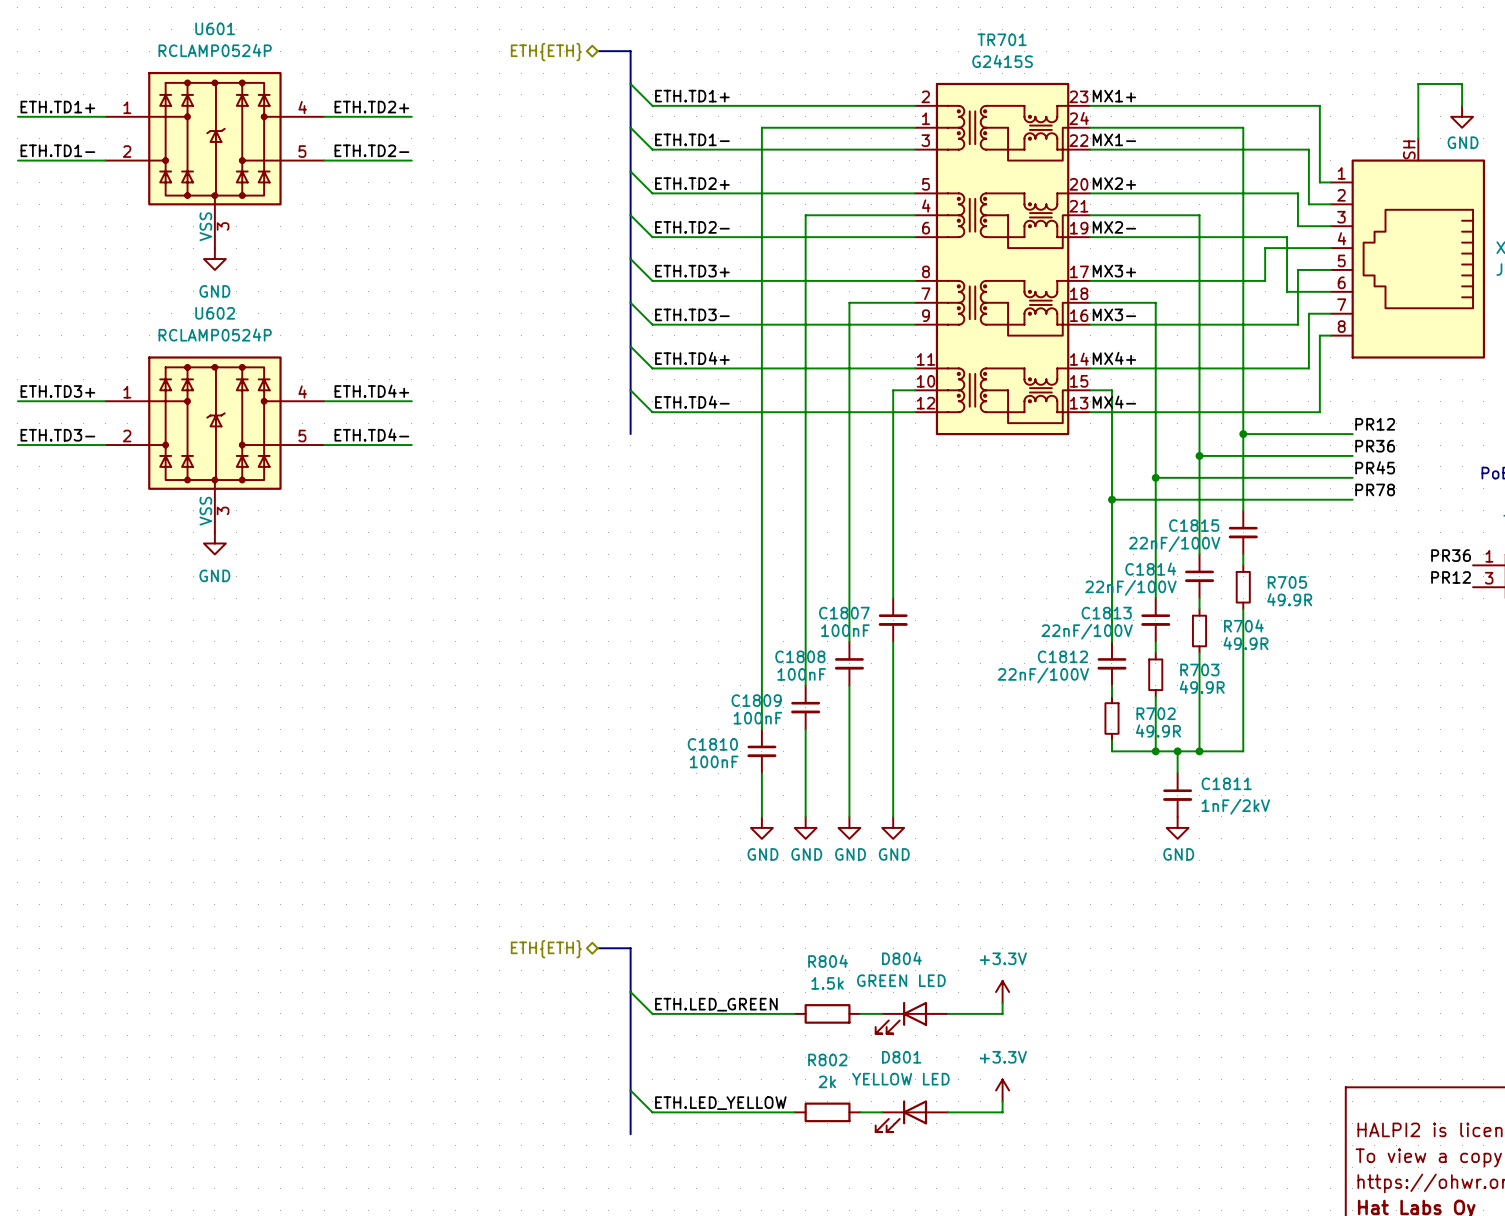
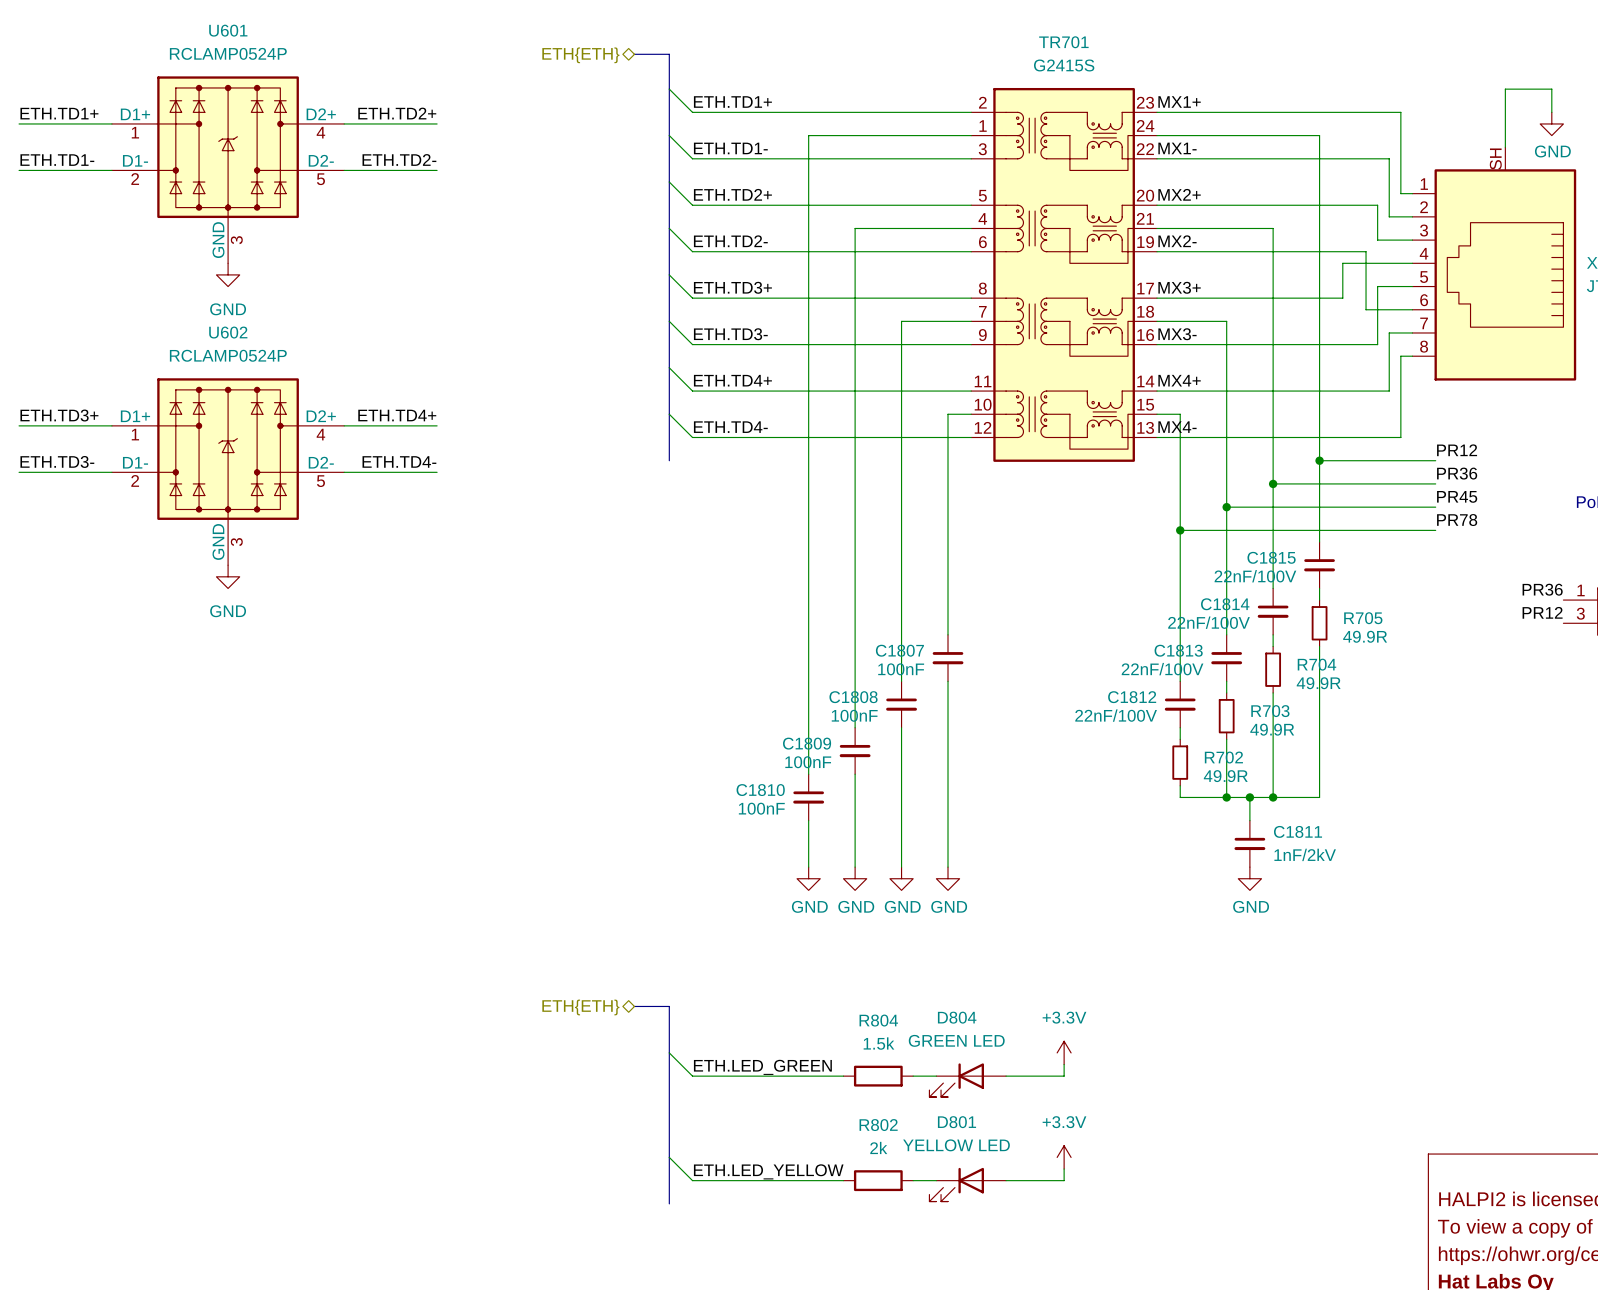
U601 symbol: [105, 71, 325, 249] -> [111, 76, 345, 264]
U602 symbol: [105, 356, 325, 533] -> [111, 378, 345, 566]

